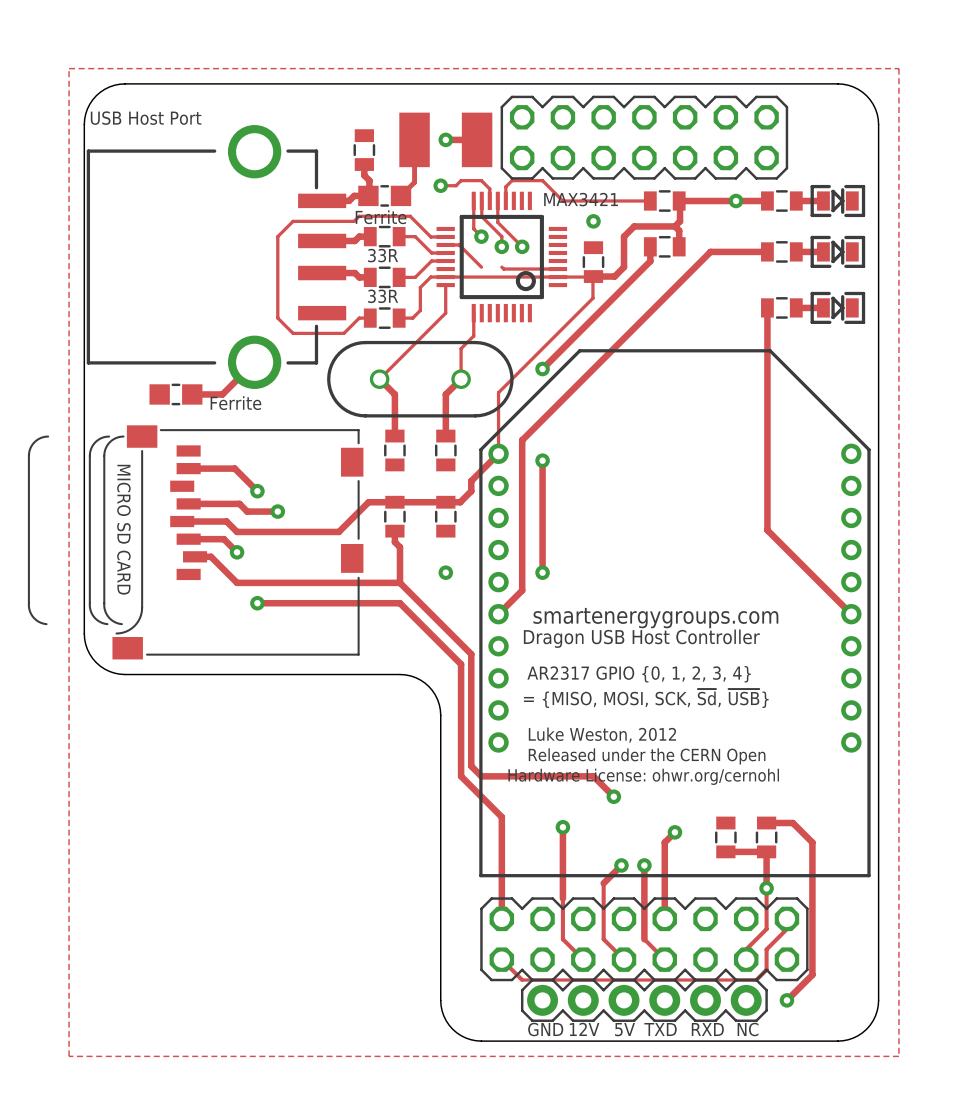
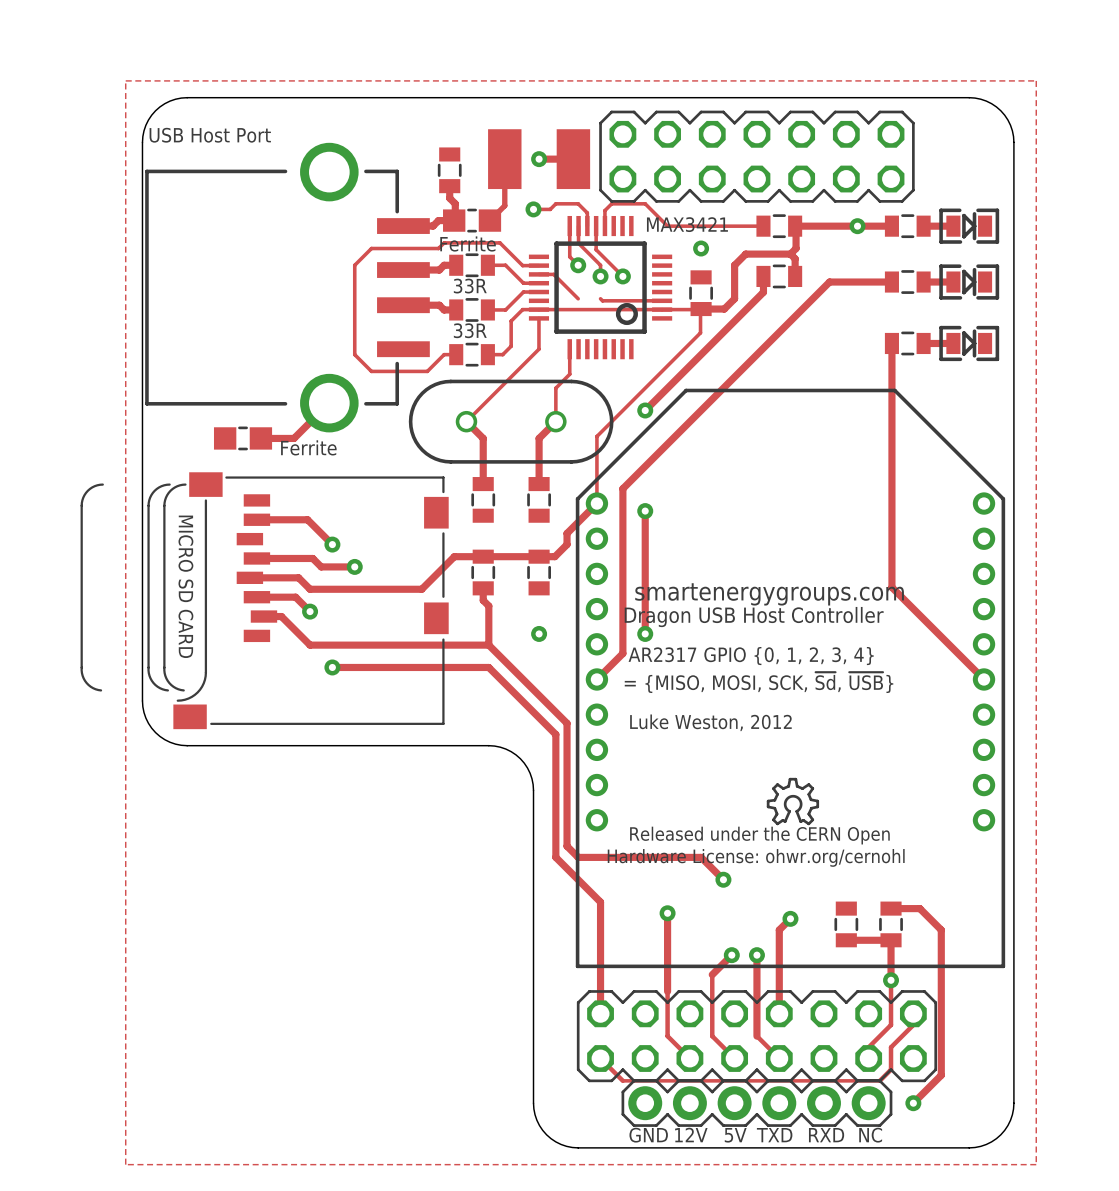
text position: smartenergygroups.com (655, 618) -> smartenergygroups.com (769, 594)
text position: Dragon USB Host Controller (641, 638) -> Dragon USB Host Controller (754, 617)
text position: AR2317 GPIO {0, 1, 2, 3, 4} (639, 674) -> AR2317 GPIO {0, 1, 2, 3, 4} (751, 656)
text position: = {MISO, MOSI, SCK, ~{Sd}, ~{USB}} (646, 698) -> = {MISO, MOSI, SCK, ~{Sd}, ~{USB}} (759, 682)
drawing: none -> [766, 777, 820, 826]
text position: Luke Weston, 2012 (602, 735) -> Luke Weston, 2012 (710, 722)

